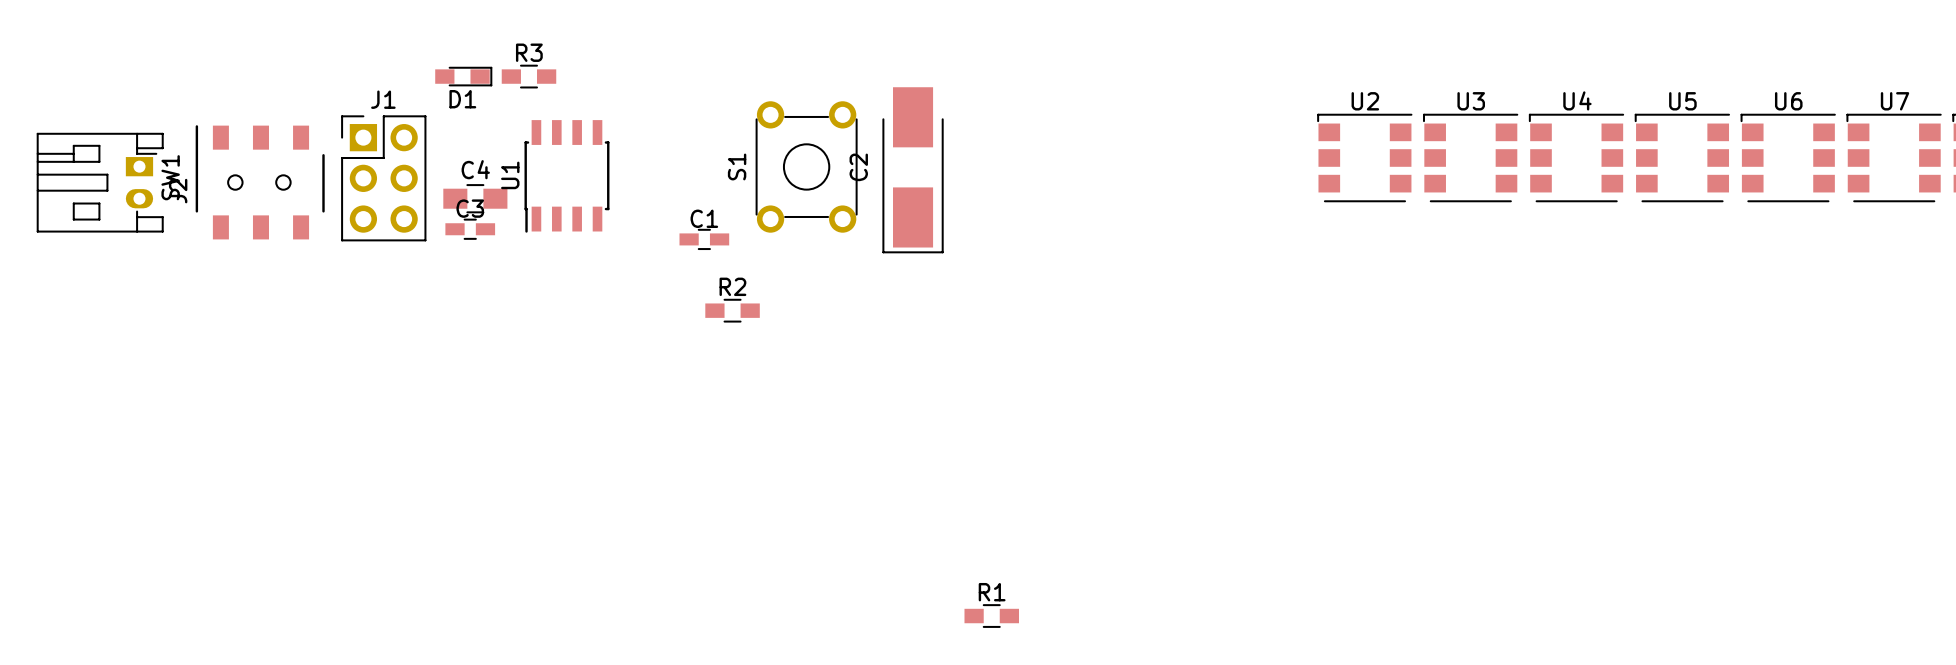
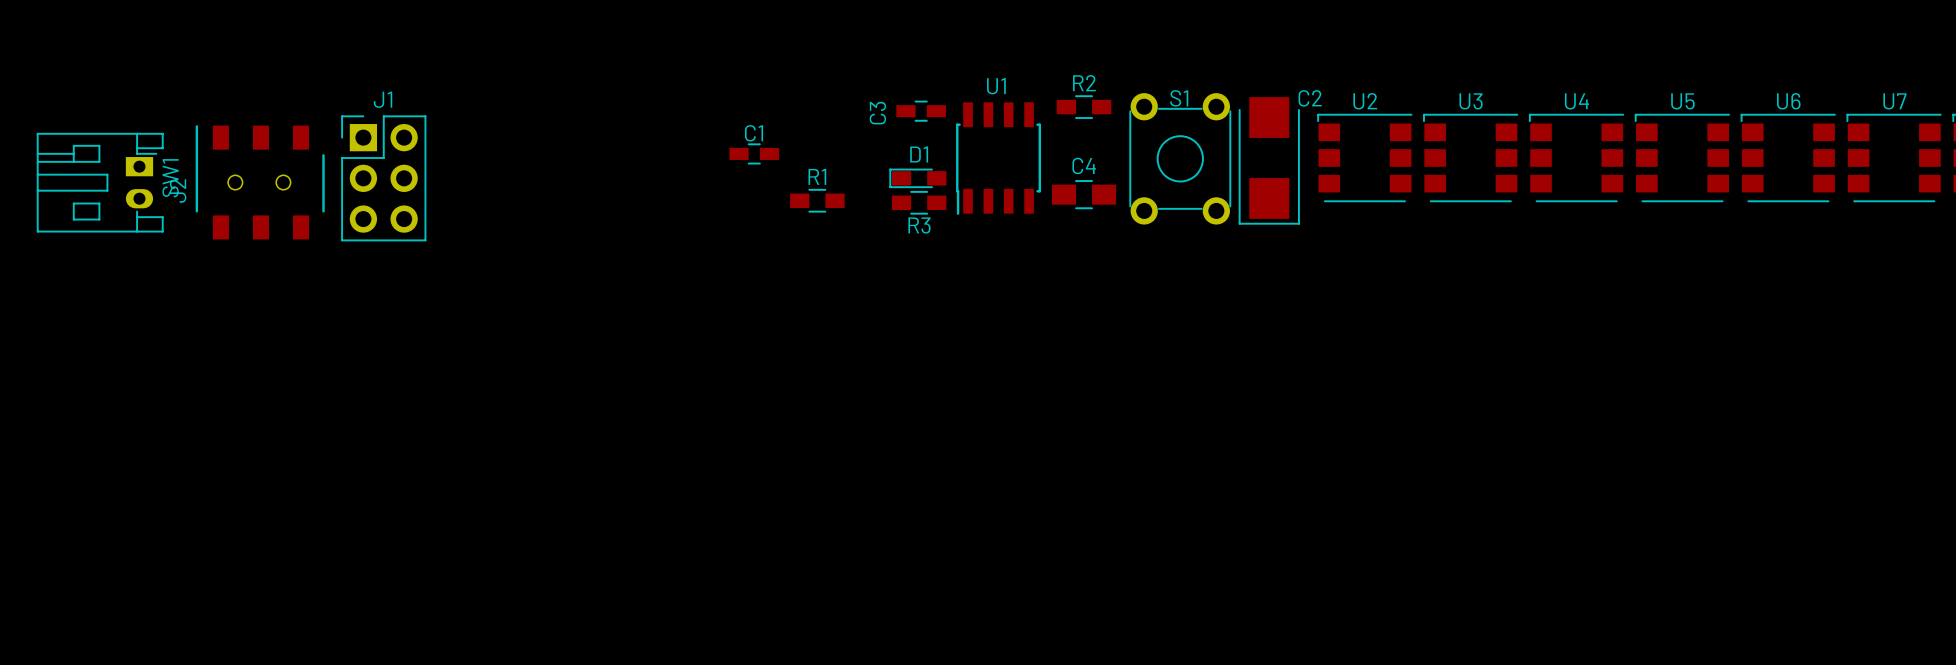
R3 name position: R3 (529, 52) -> R3 (919, 225)
D1 rotation: 0° (463, 76) -> 180° (917, 178)
D1 position: (463, 76) -> (917, 178)
R3 position: (528, 76) -> (919, 202)
C2 footprint: [882, 87, 944, 254] -> [1238, 97, 1300, 225]
S1 name rotation: 0° (737, 166) -> 90° clockwise (1179, 98)
S1 name position: S1 (737, 166) -> S1 (1179, 98)
S1 position: (806, 166) -> (1180, 158)
C2 name position: C2 (858, 167) -> C2 (1310, 98)
U1 name rotation: 0° (510, 175) -> 90° clockwise (996, 86)
U1 name position: U1 (510, 175) -> U1 (996, 86)
U1 position: (566, 176) -> (998, 158)
C4 position: (475, 198) -> (1084, 194)
C3 name rotation: 0° (470, 208) -> 90° counterclockwise (877, 113)
C3 name position: C3 (470, 208) -> C3 (877, 113)
C3 position: (470, 229) -> (921, 111)
C1 position: (704, 239) -> (754, 153)
R2 position: (732, 310) -> (1084, 107)
R1 position: (991, 616) -> (817, 200)

